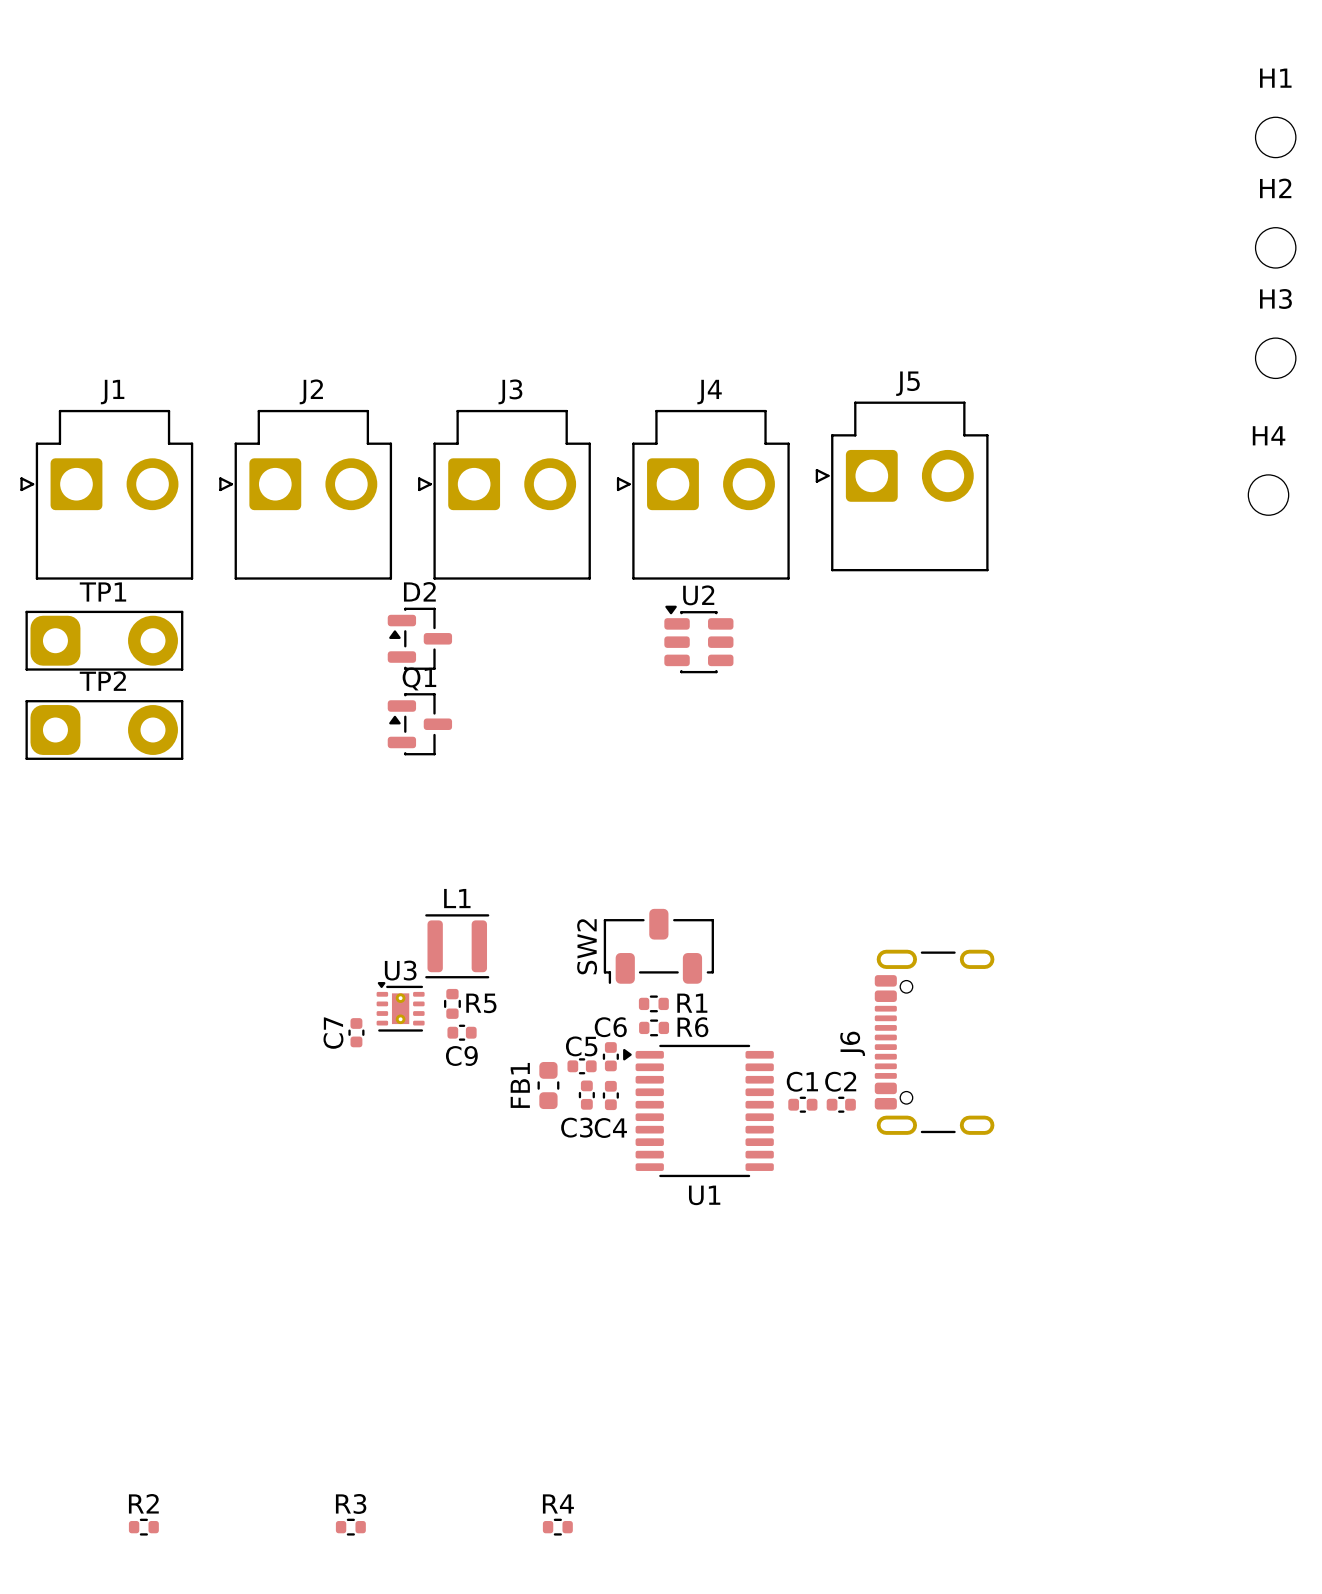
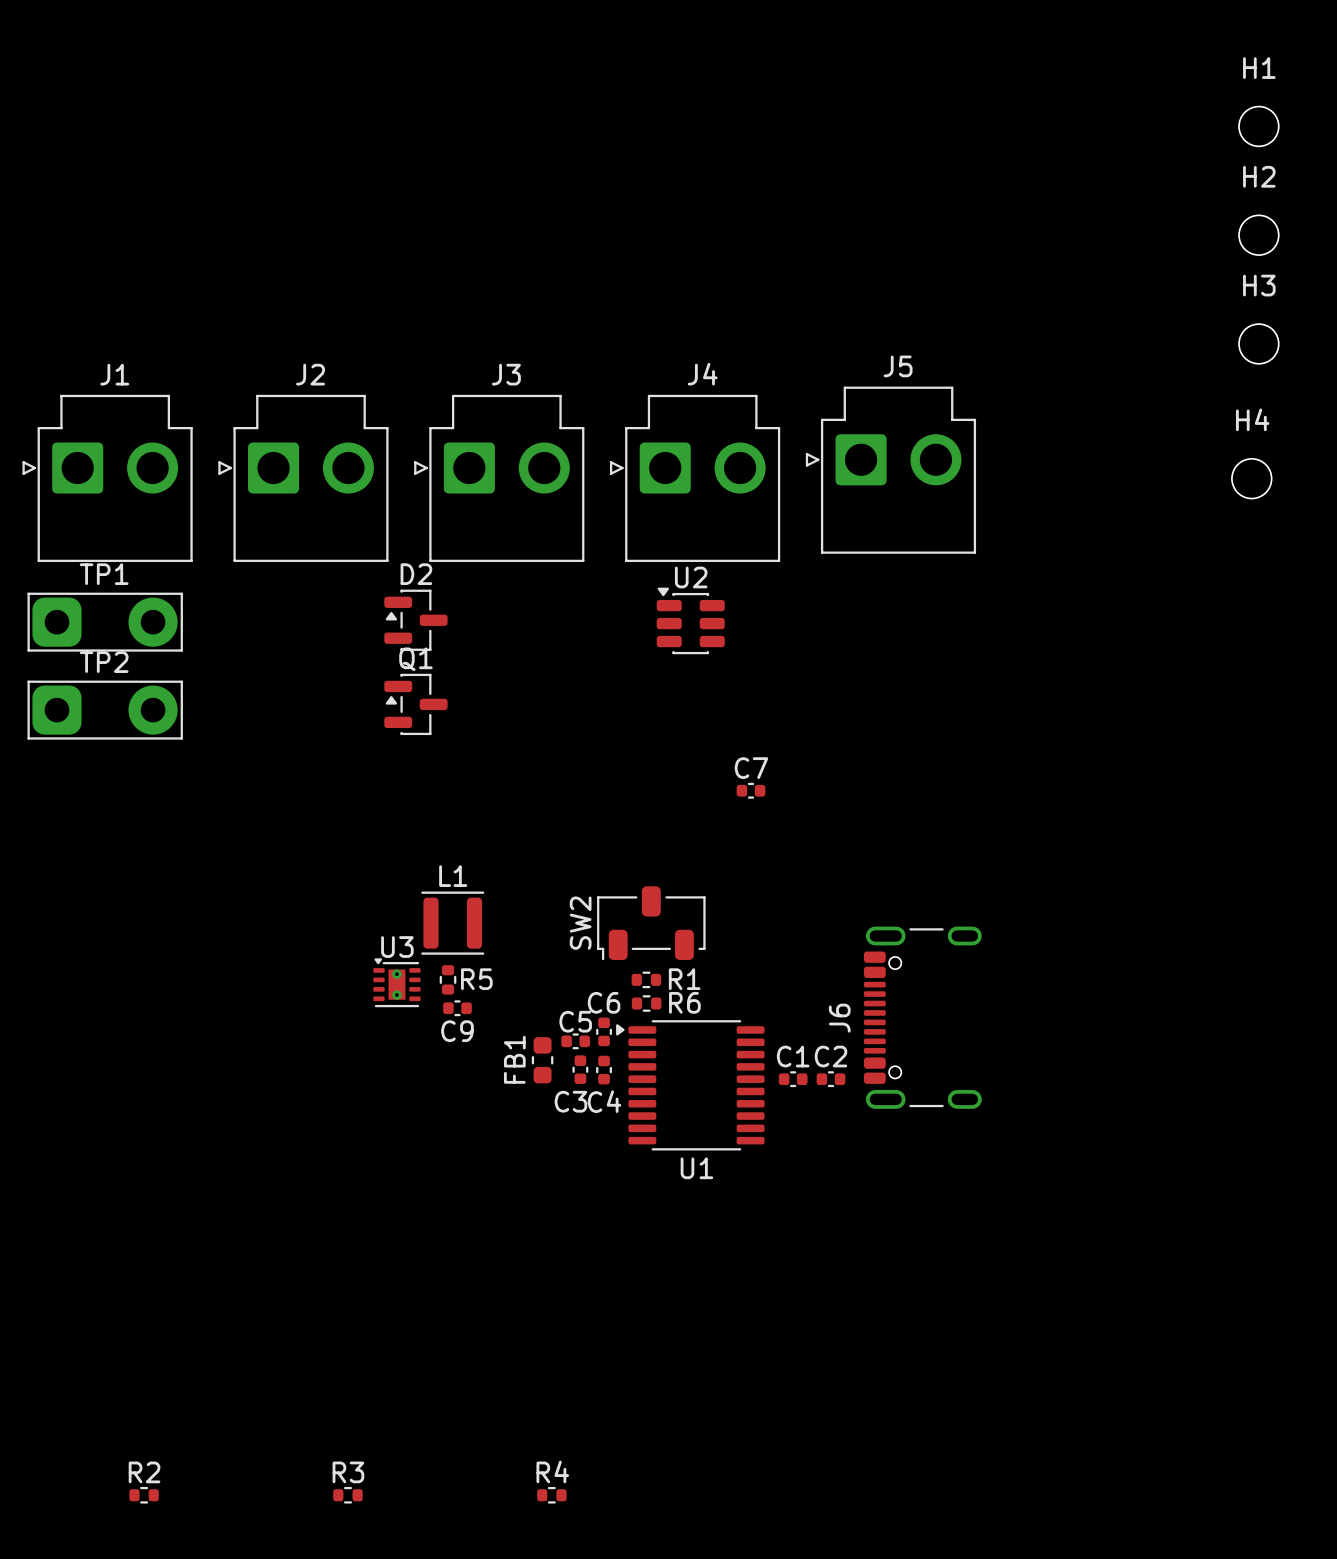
C7 rotation: 0° (356, 1032) -> 90° clockwise (750, 790)
C7 position: (356, 1032) -> (750, 790)

